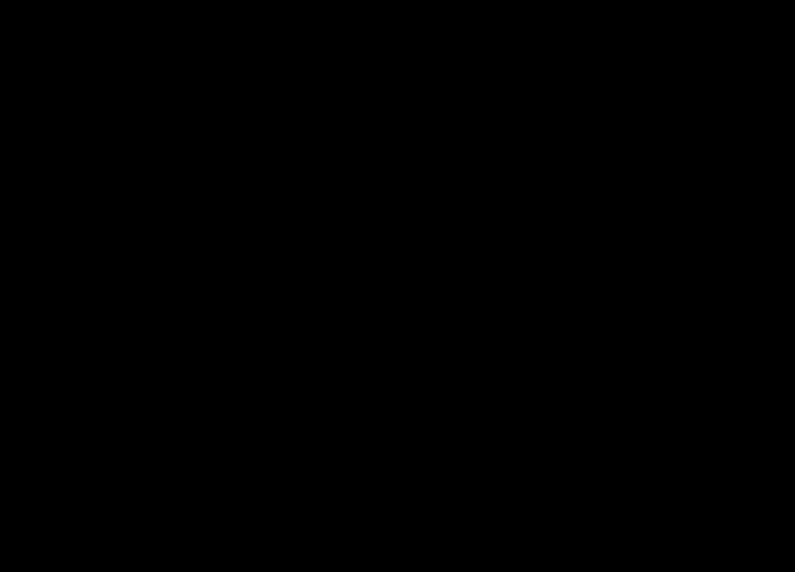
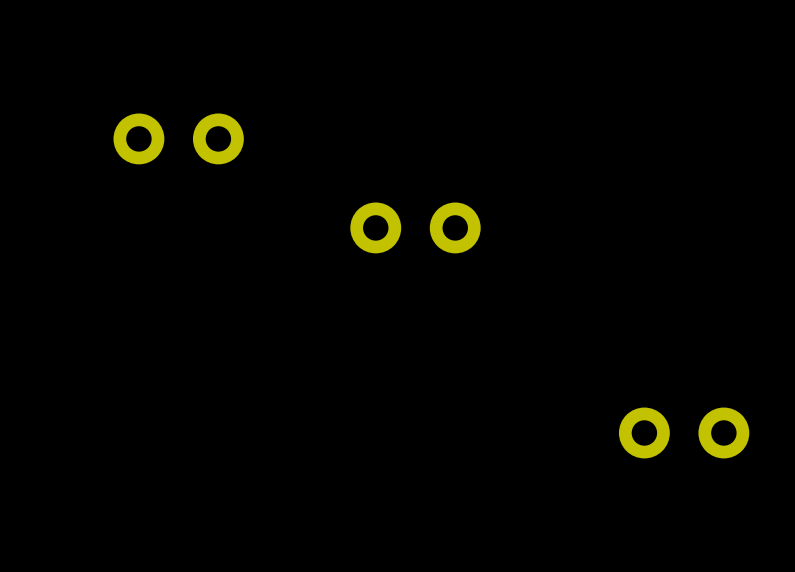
part: none -> (178, 138)
part: none -> (415, 227)
part: none -> (684, 432)

